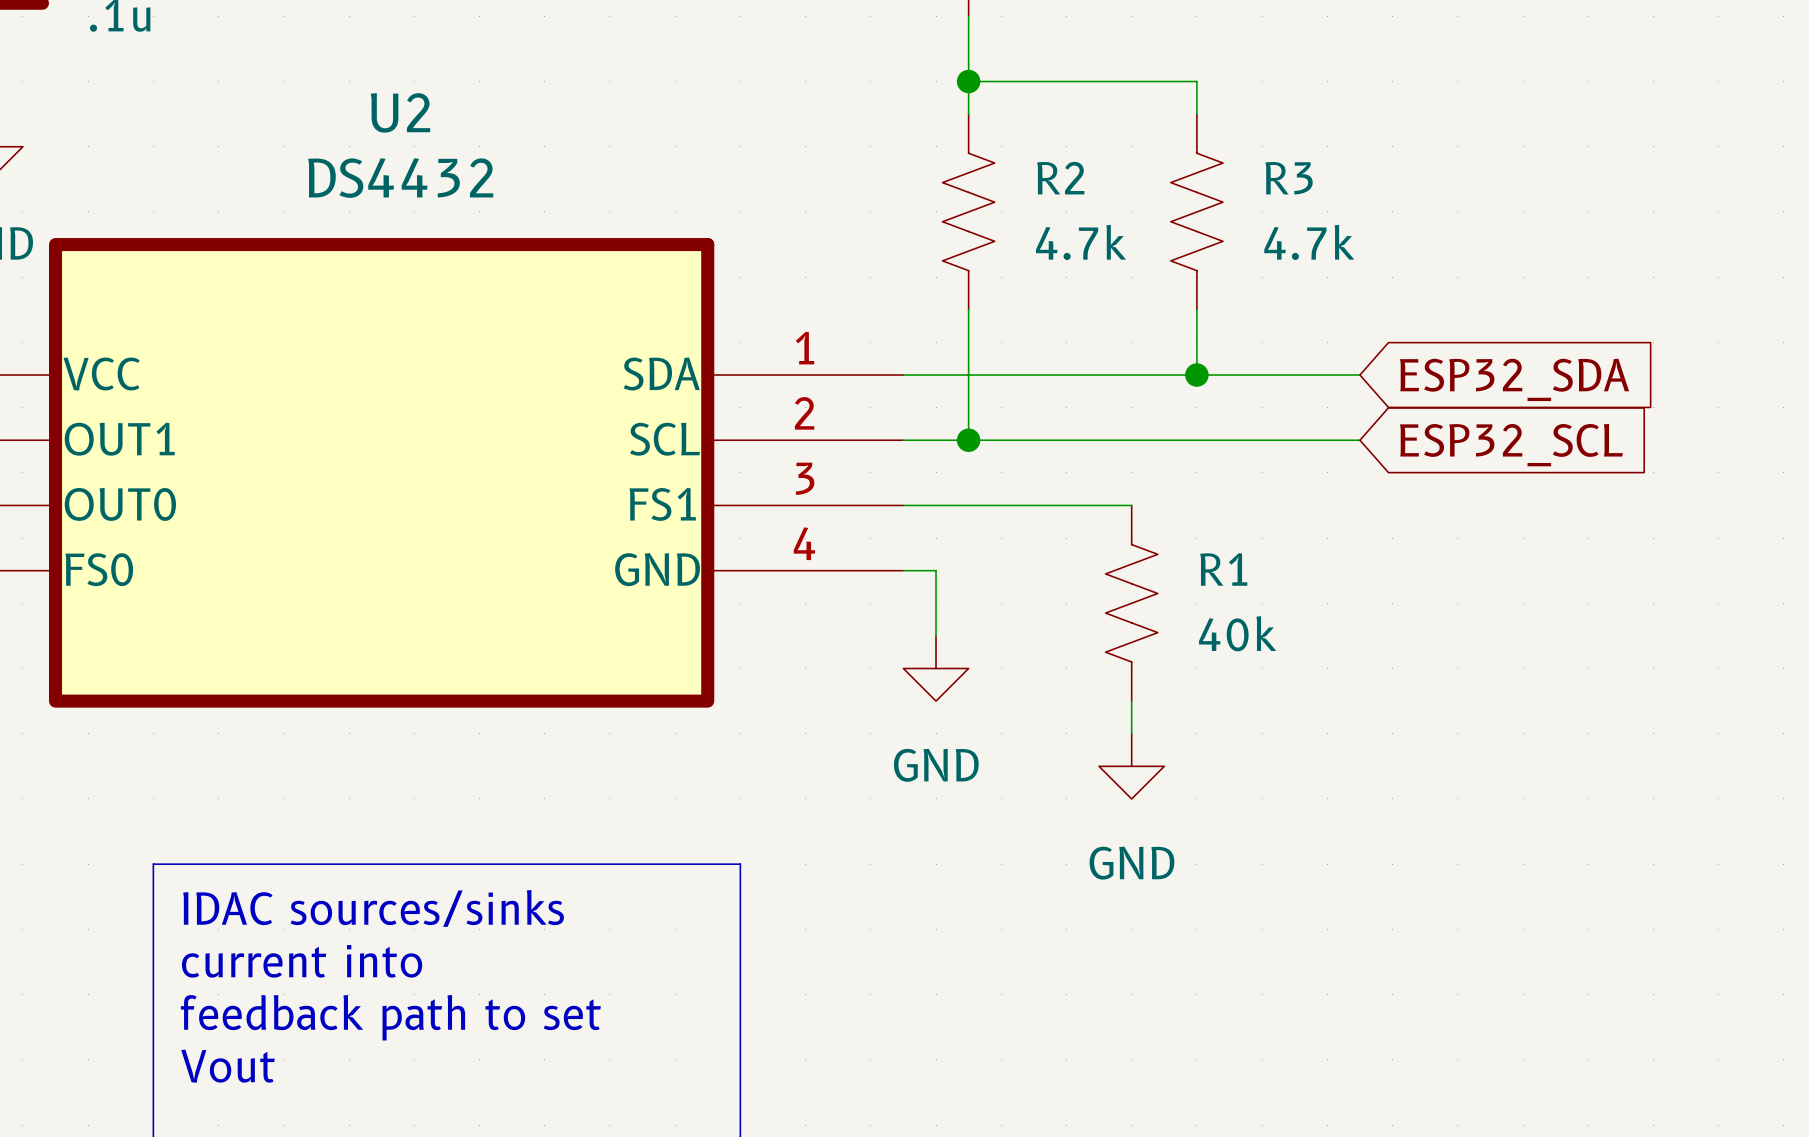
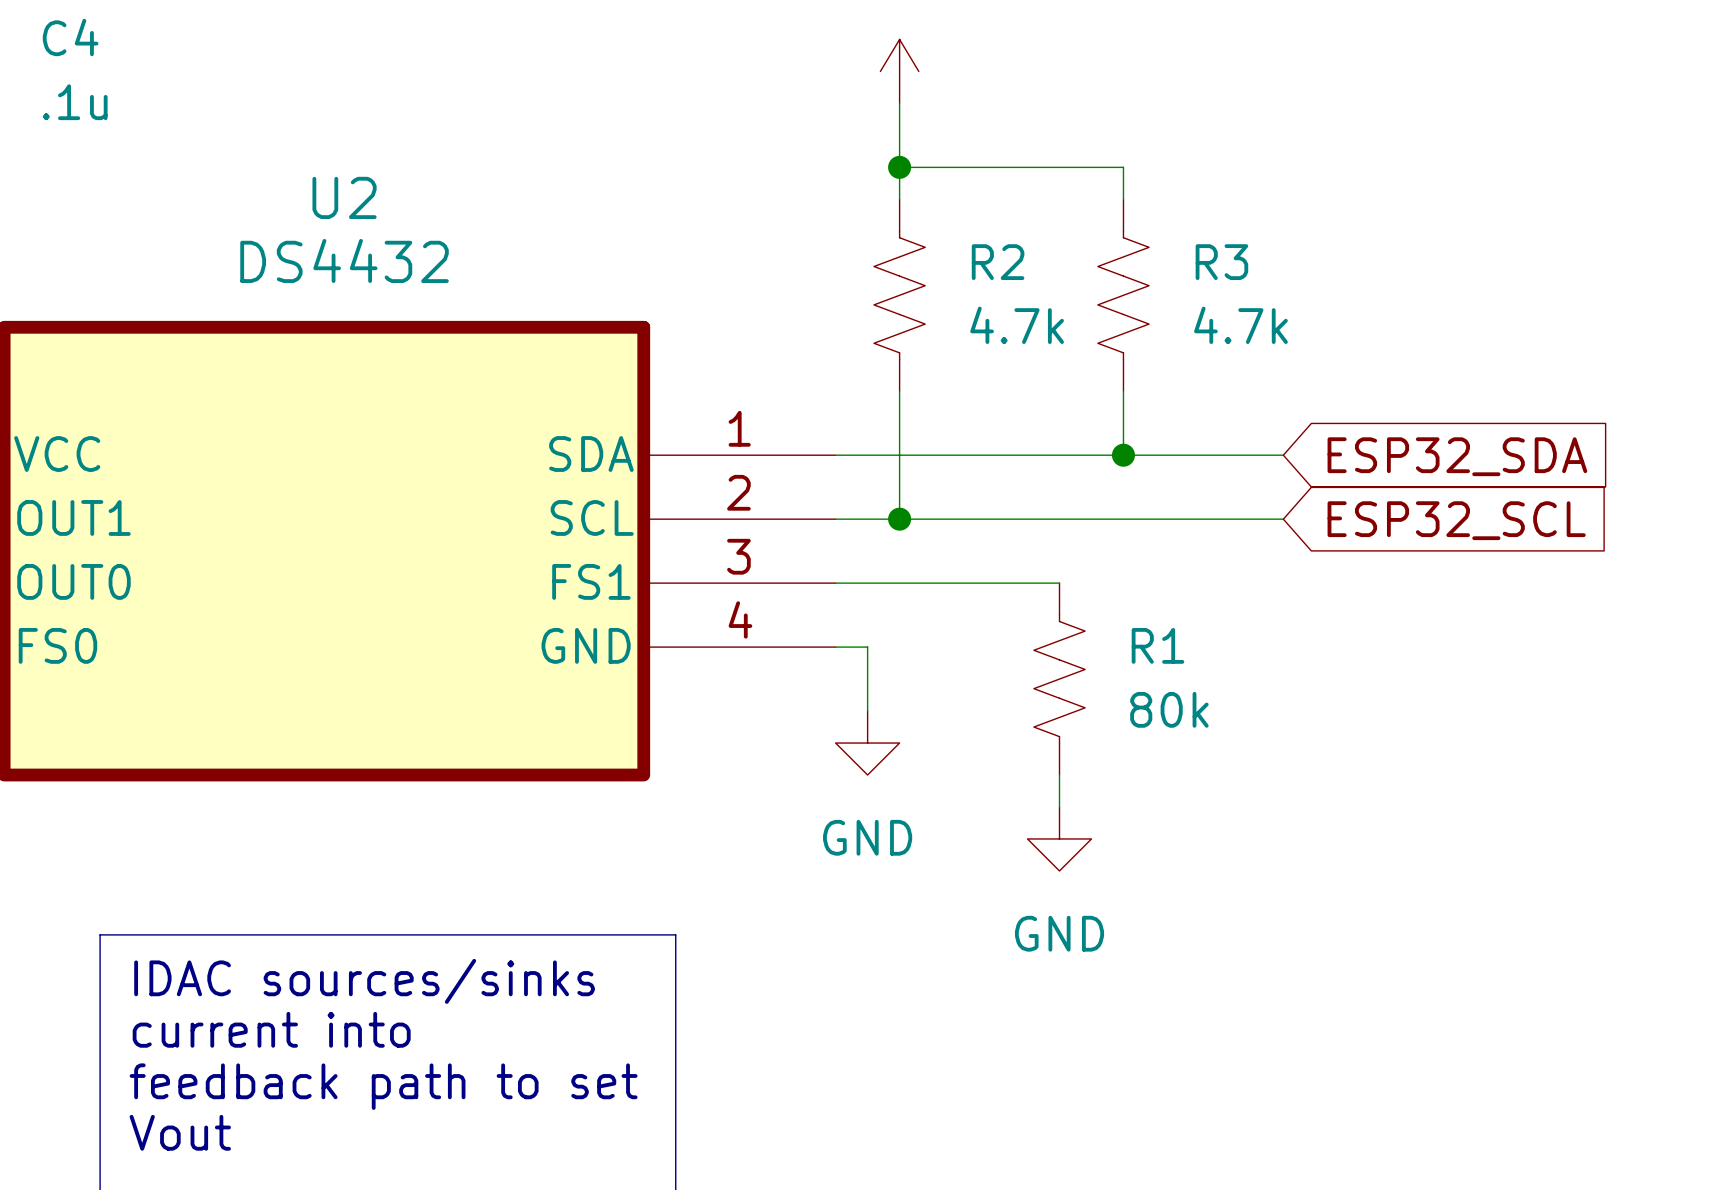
R1 value: 40k (1237, 633) -> 80k (1169, 709)

